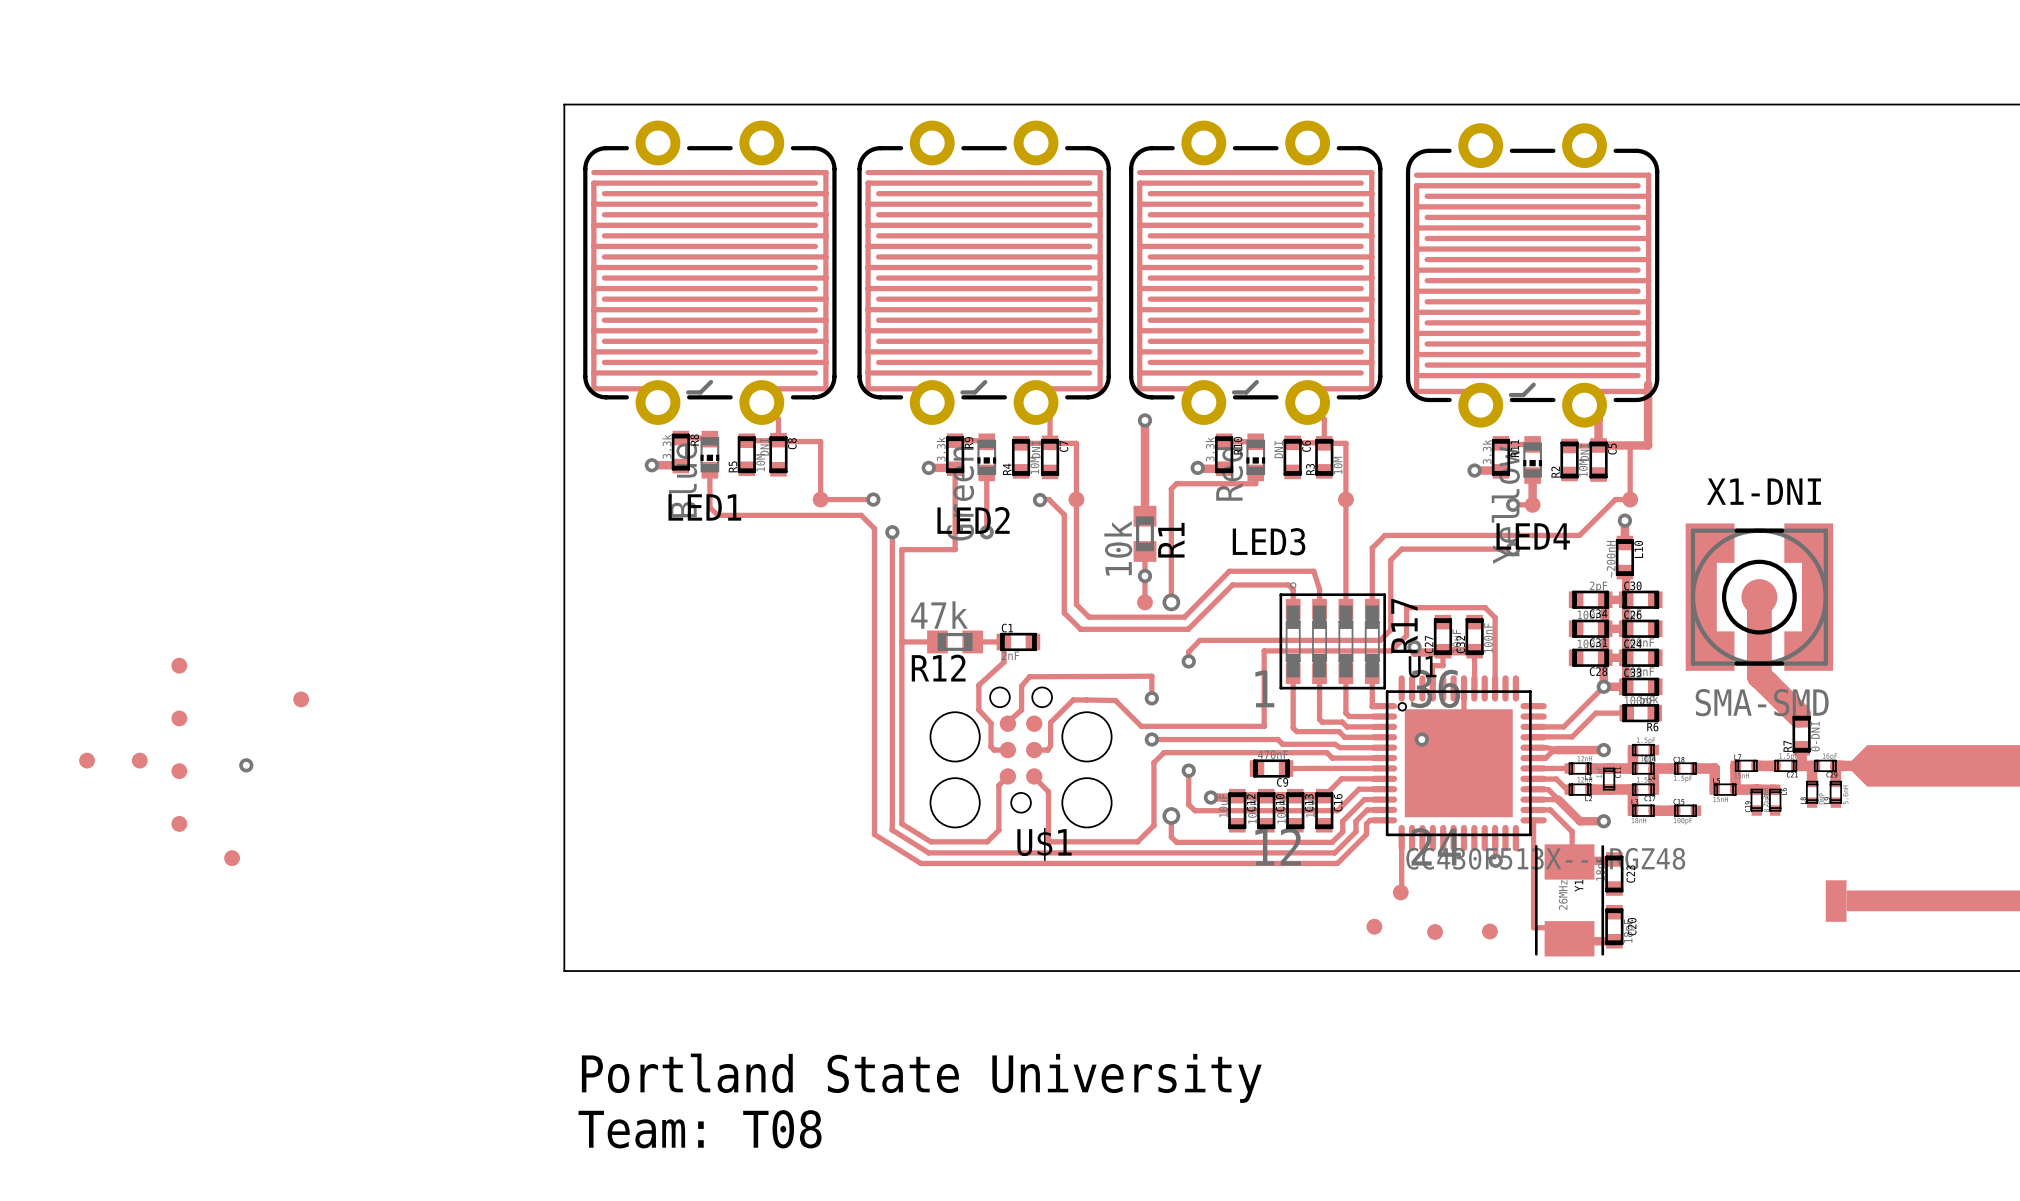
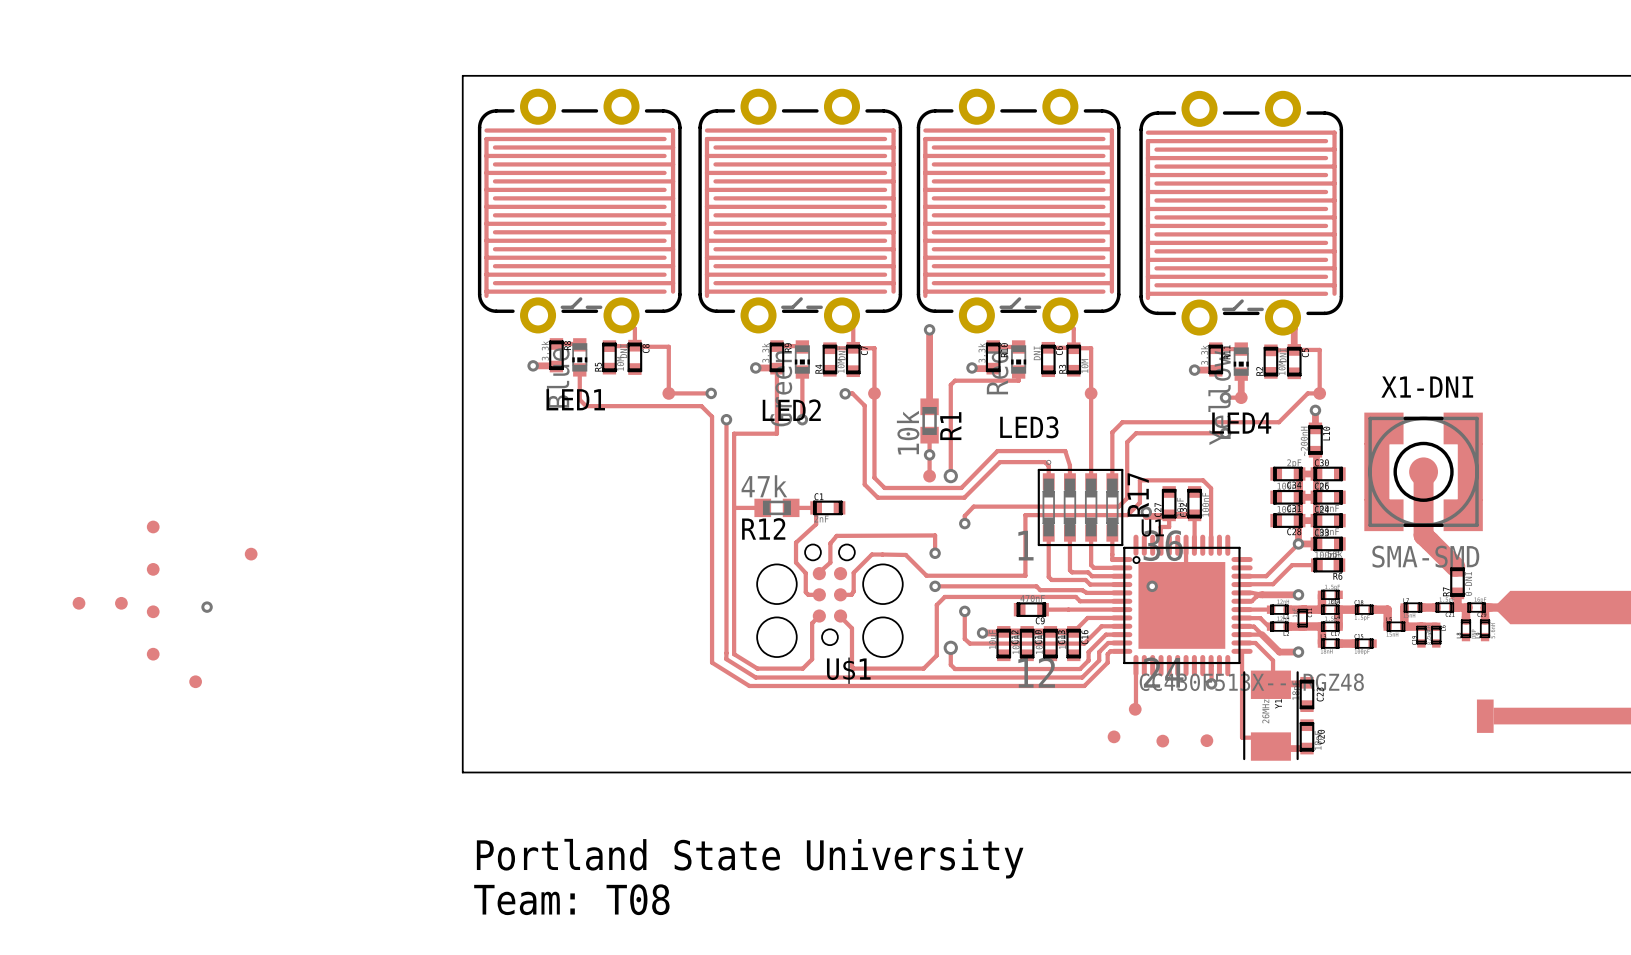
part footprint: [583, 120, 837, 425] -> [477, 88, 682, 334]
part footprint: [857, 120, 1111, 425] -> [698, 88, 903, 334]
part footprint: [1129, 120, 1383, 425] -> [916, 88, 1121, 334]
part footprint: [1405, 123, 1660, 428] -> [1139, 90, 1344, 336]
track: (1648, 384) (1648, 445) (1598, 445) -> none

